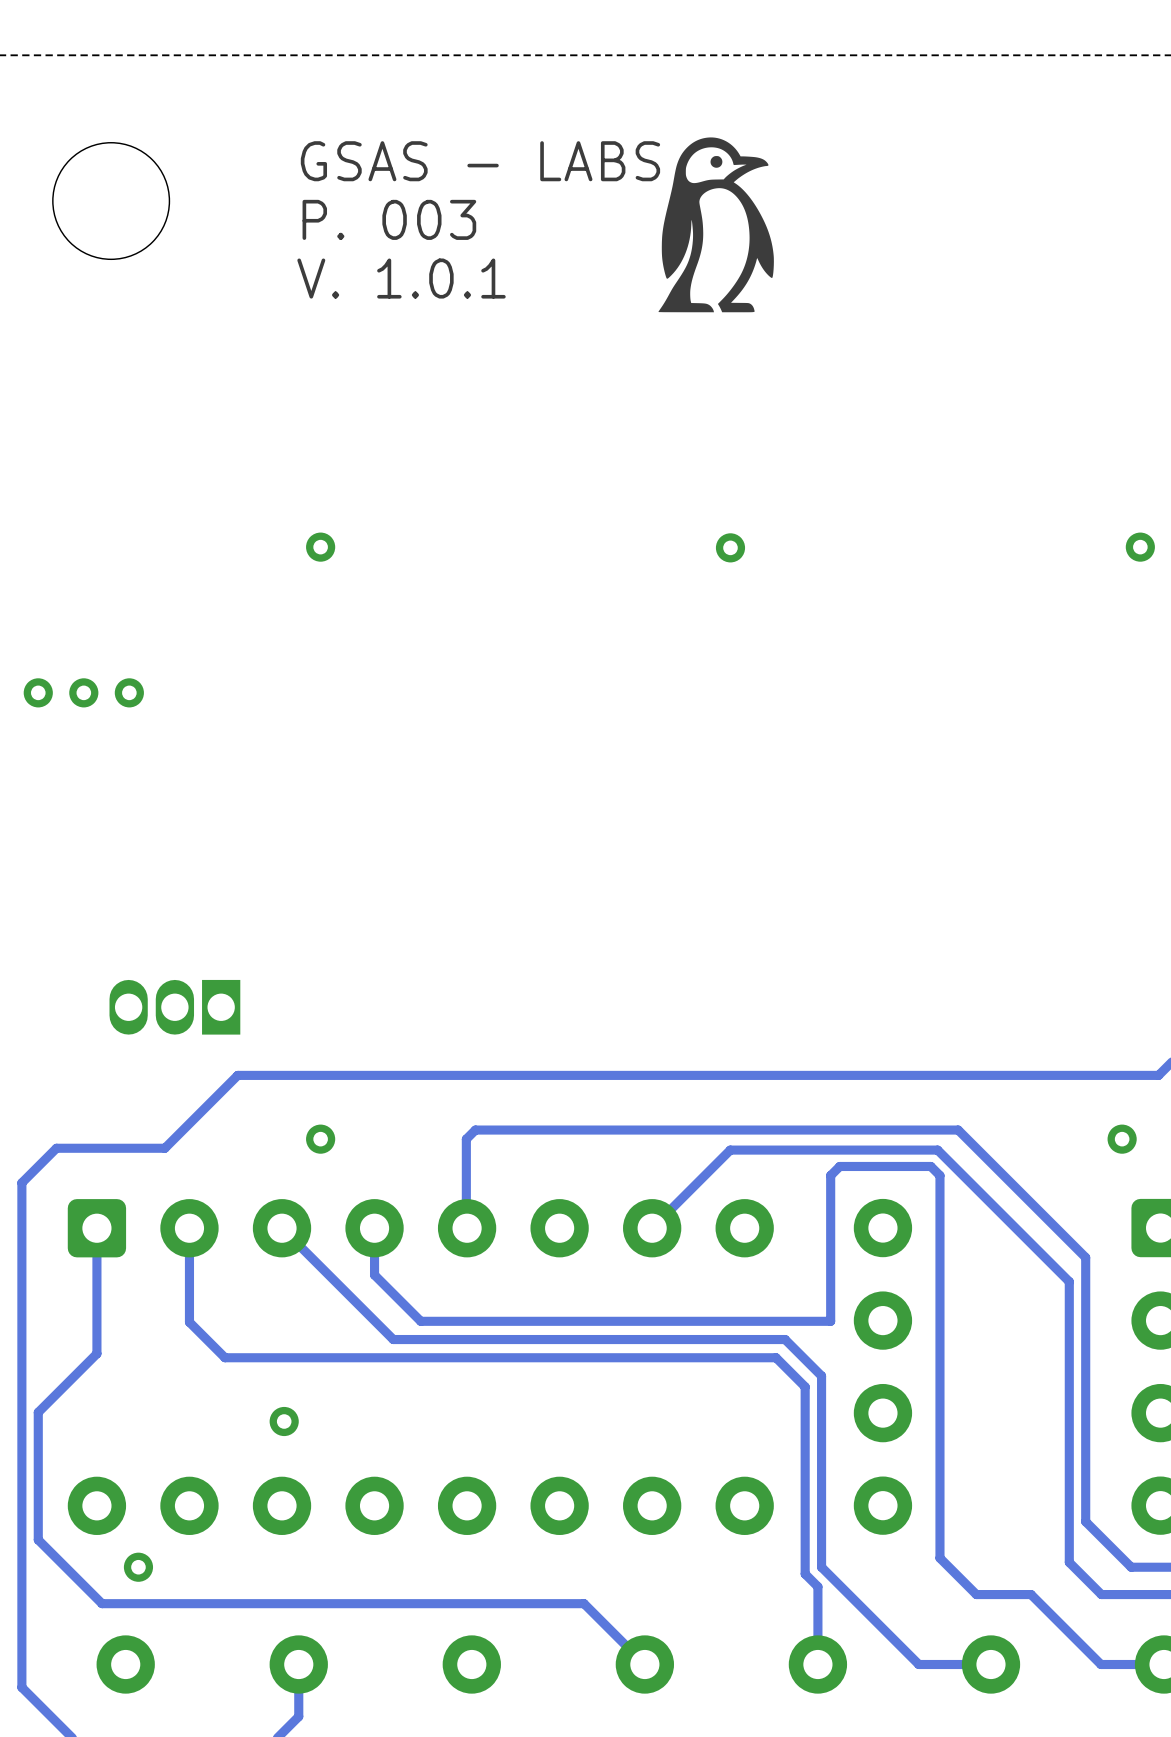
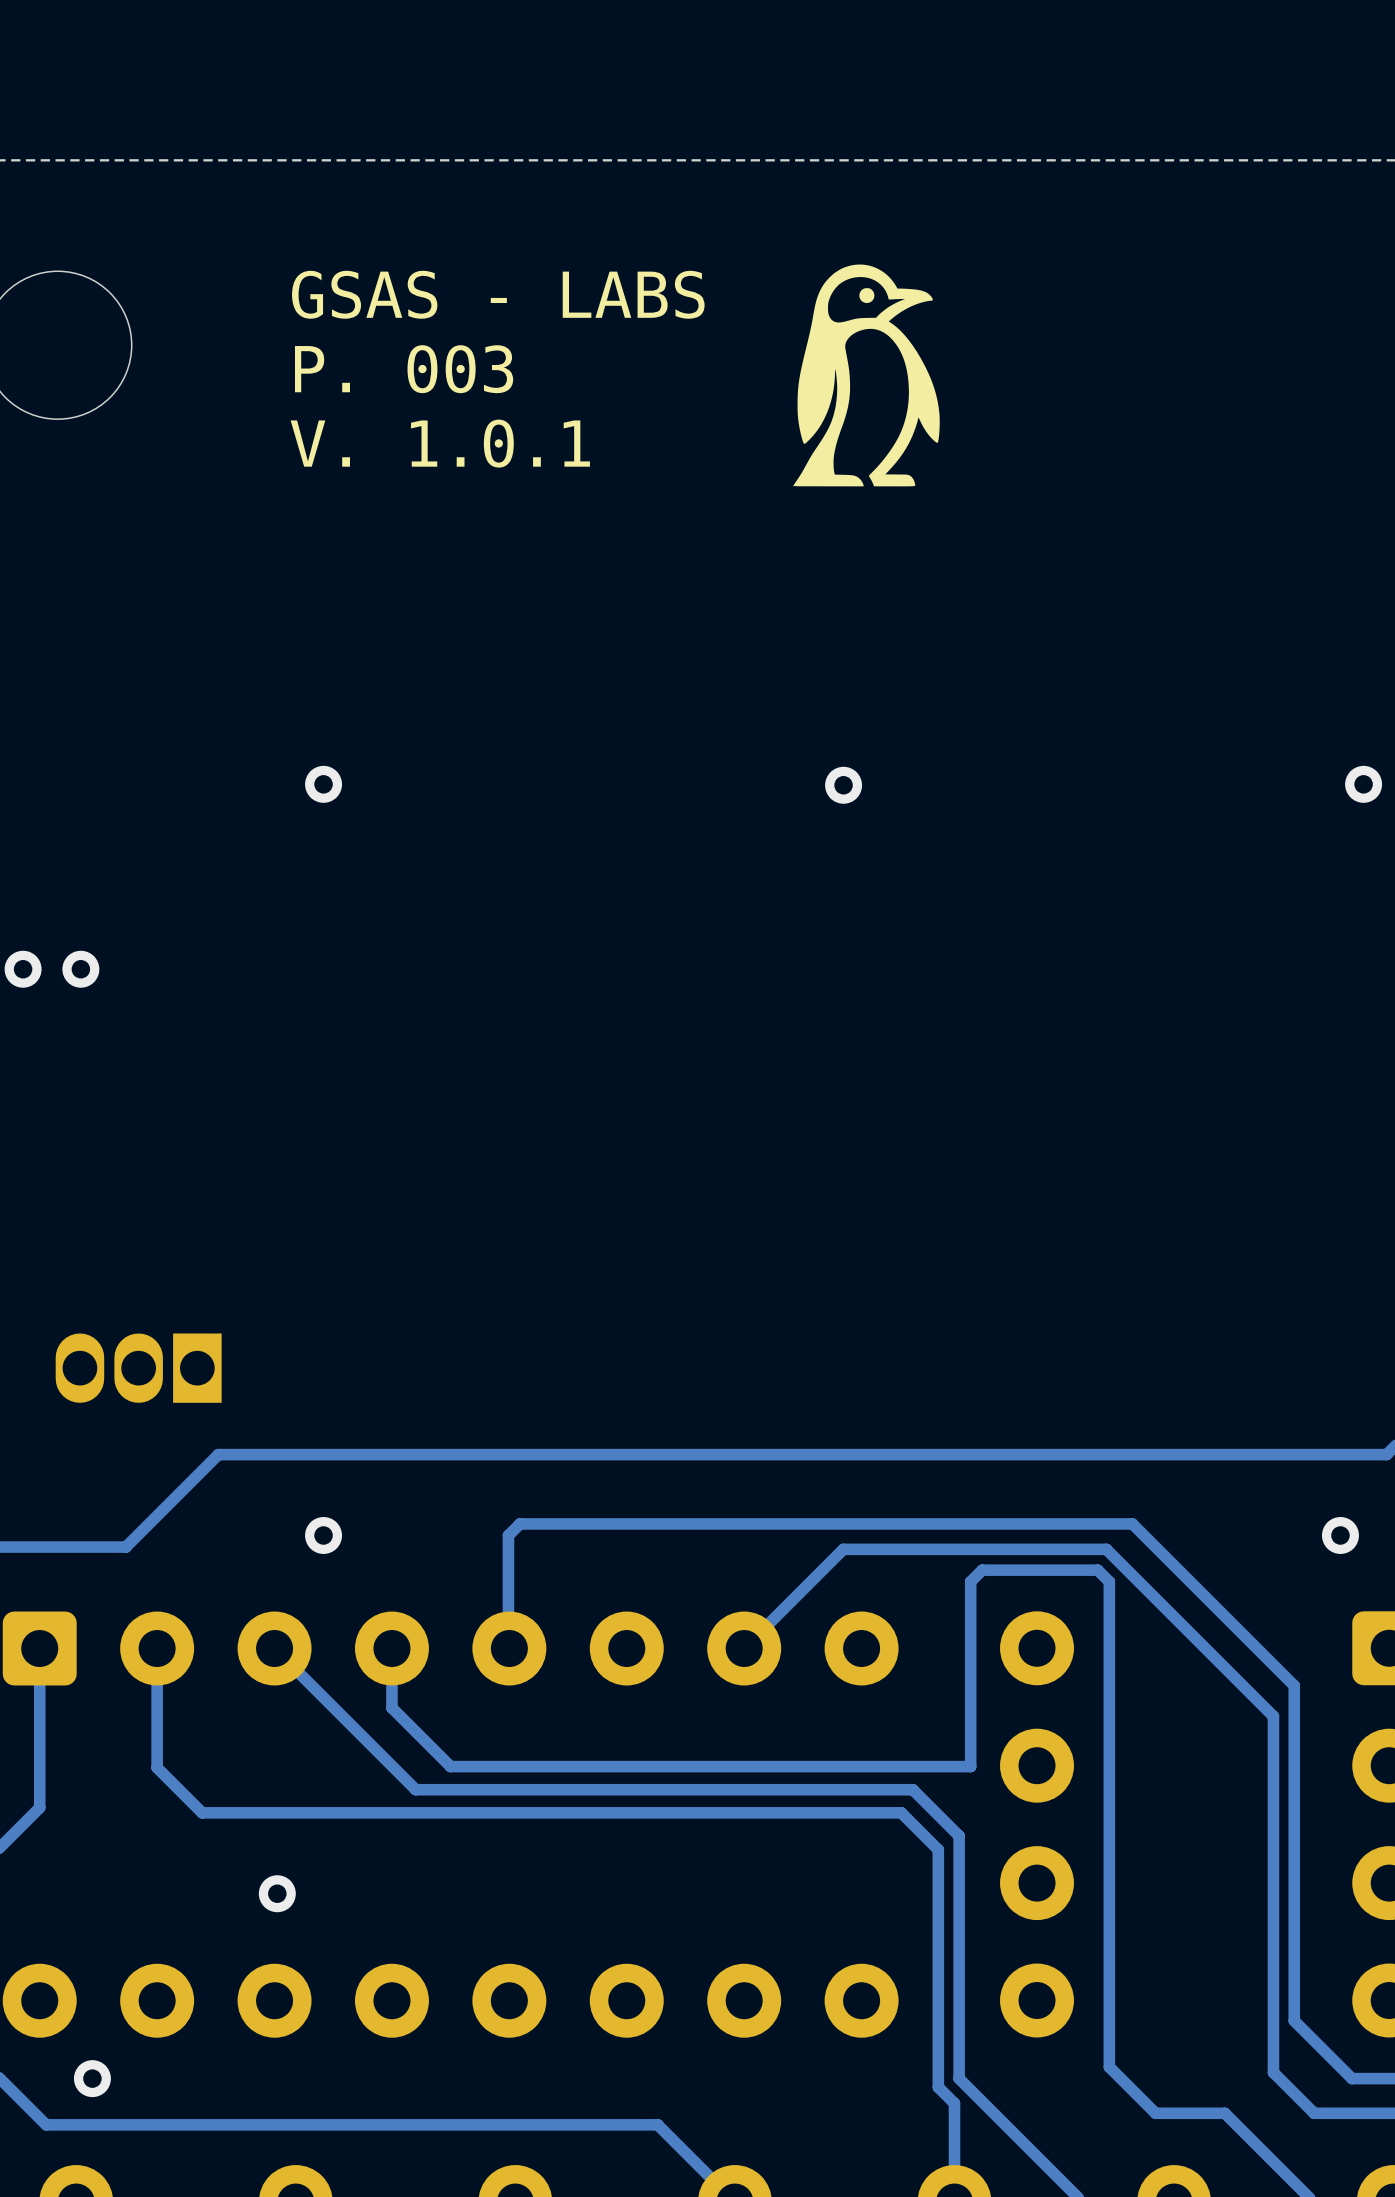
drawing position: (716, 161) -> (866, 295)
drawing position: (716, 224) -> (866, 375)

